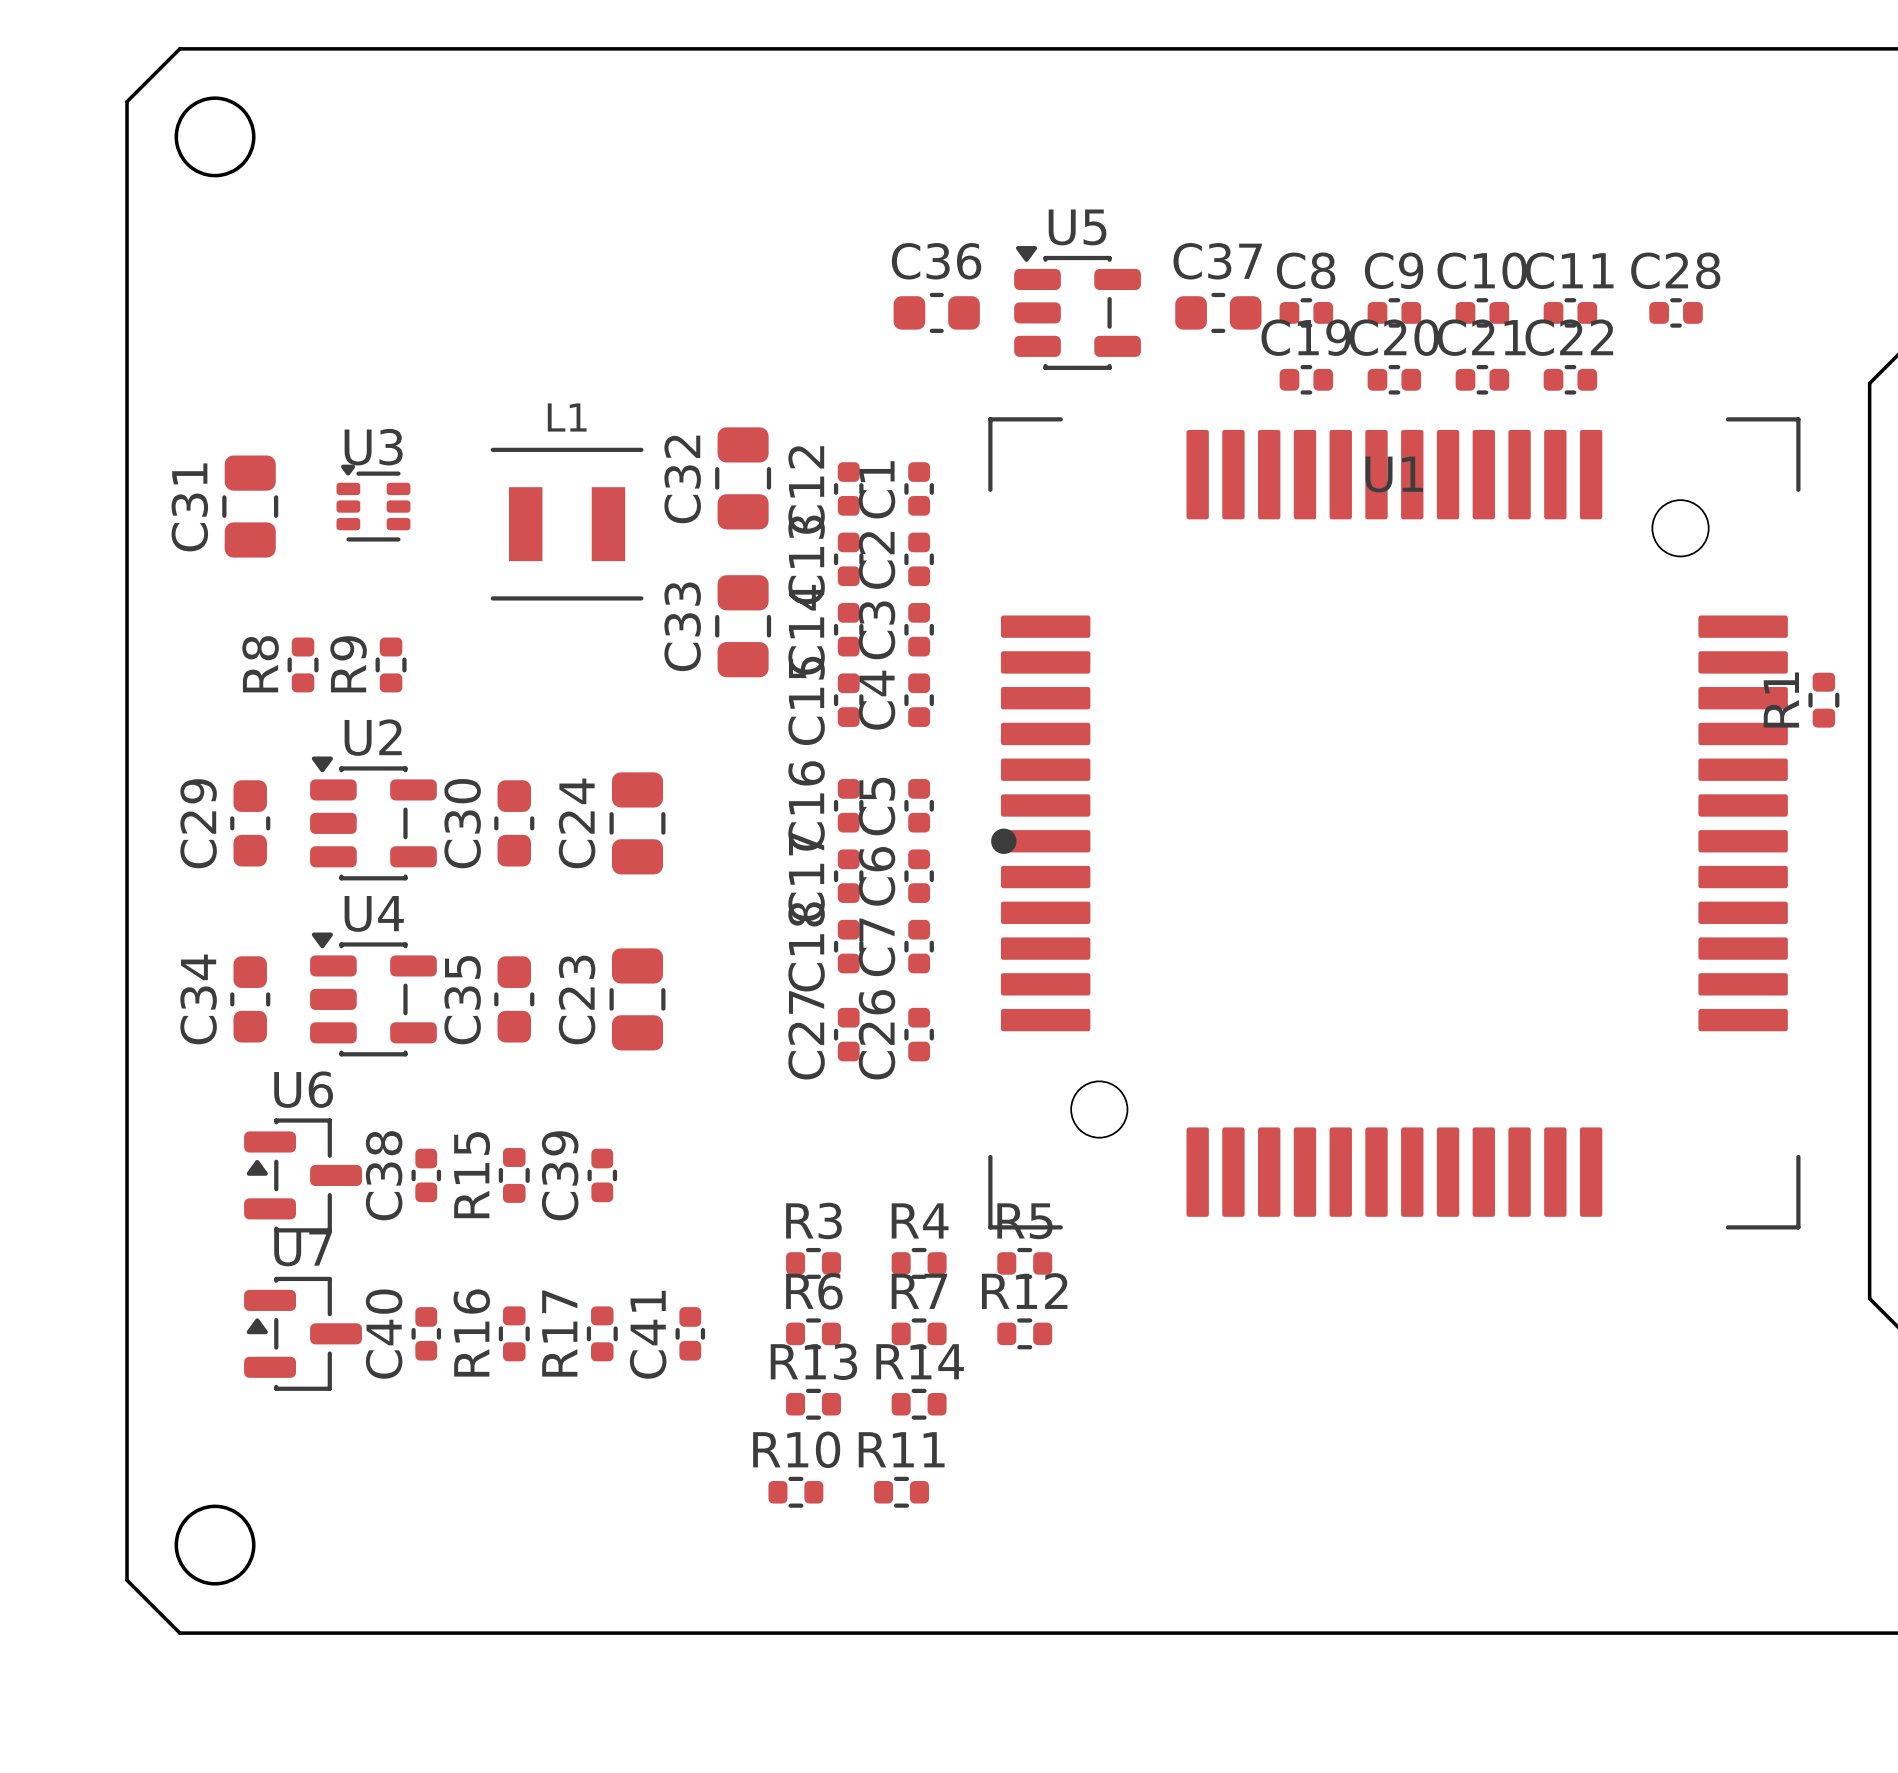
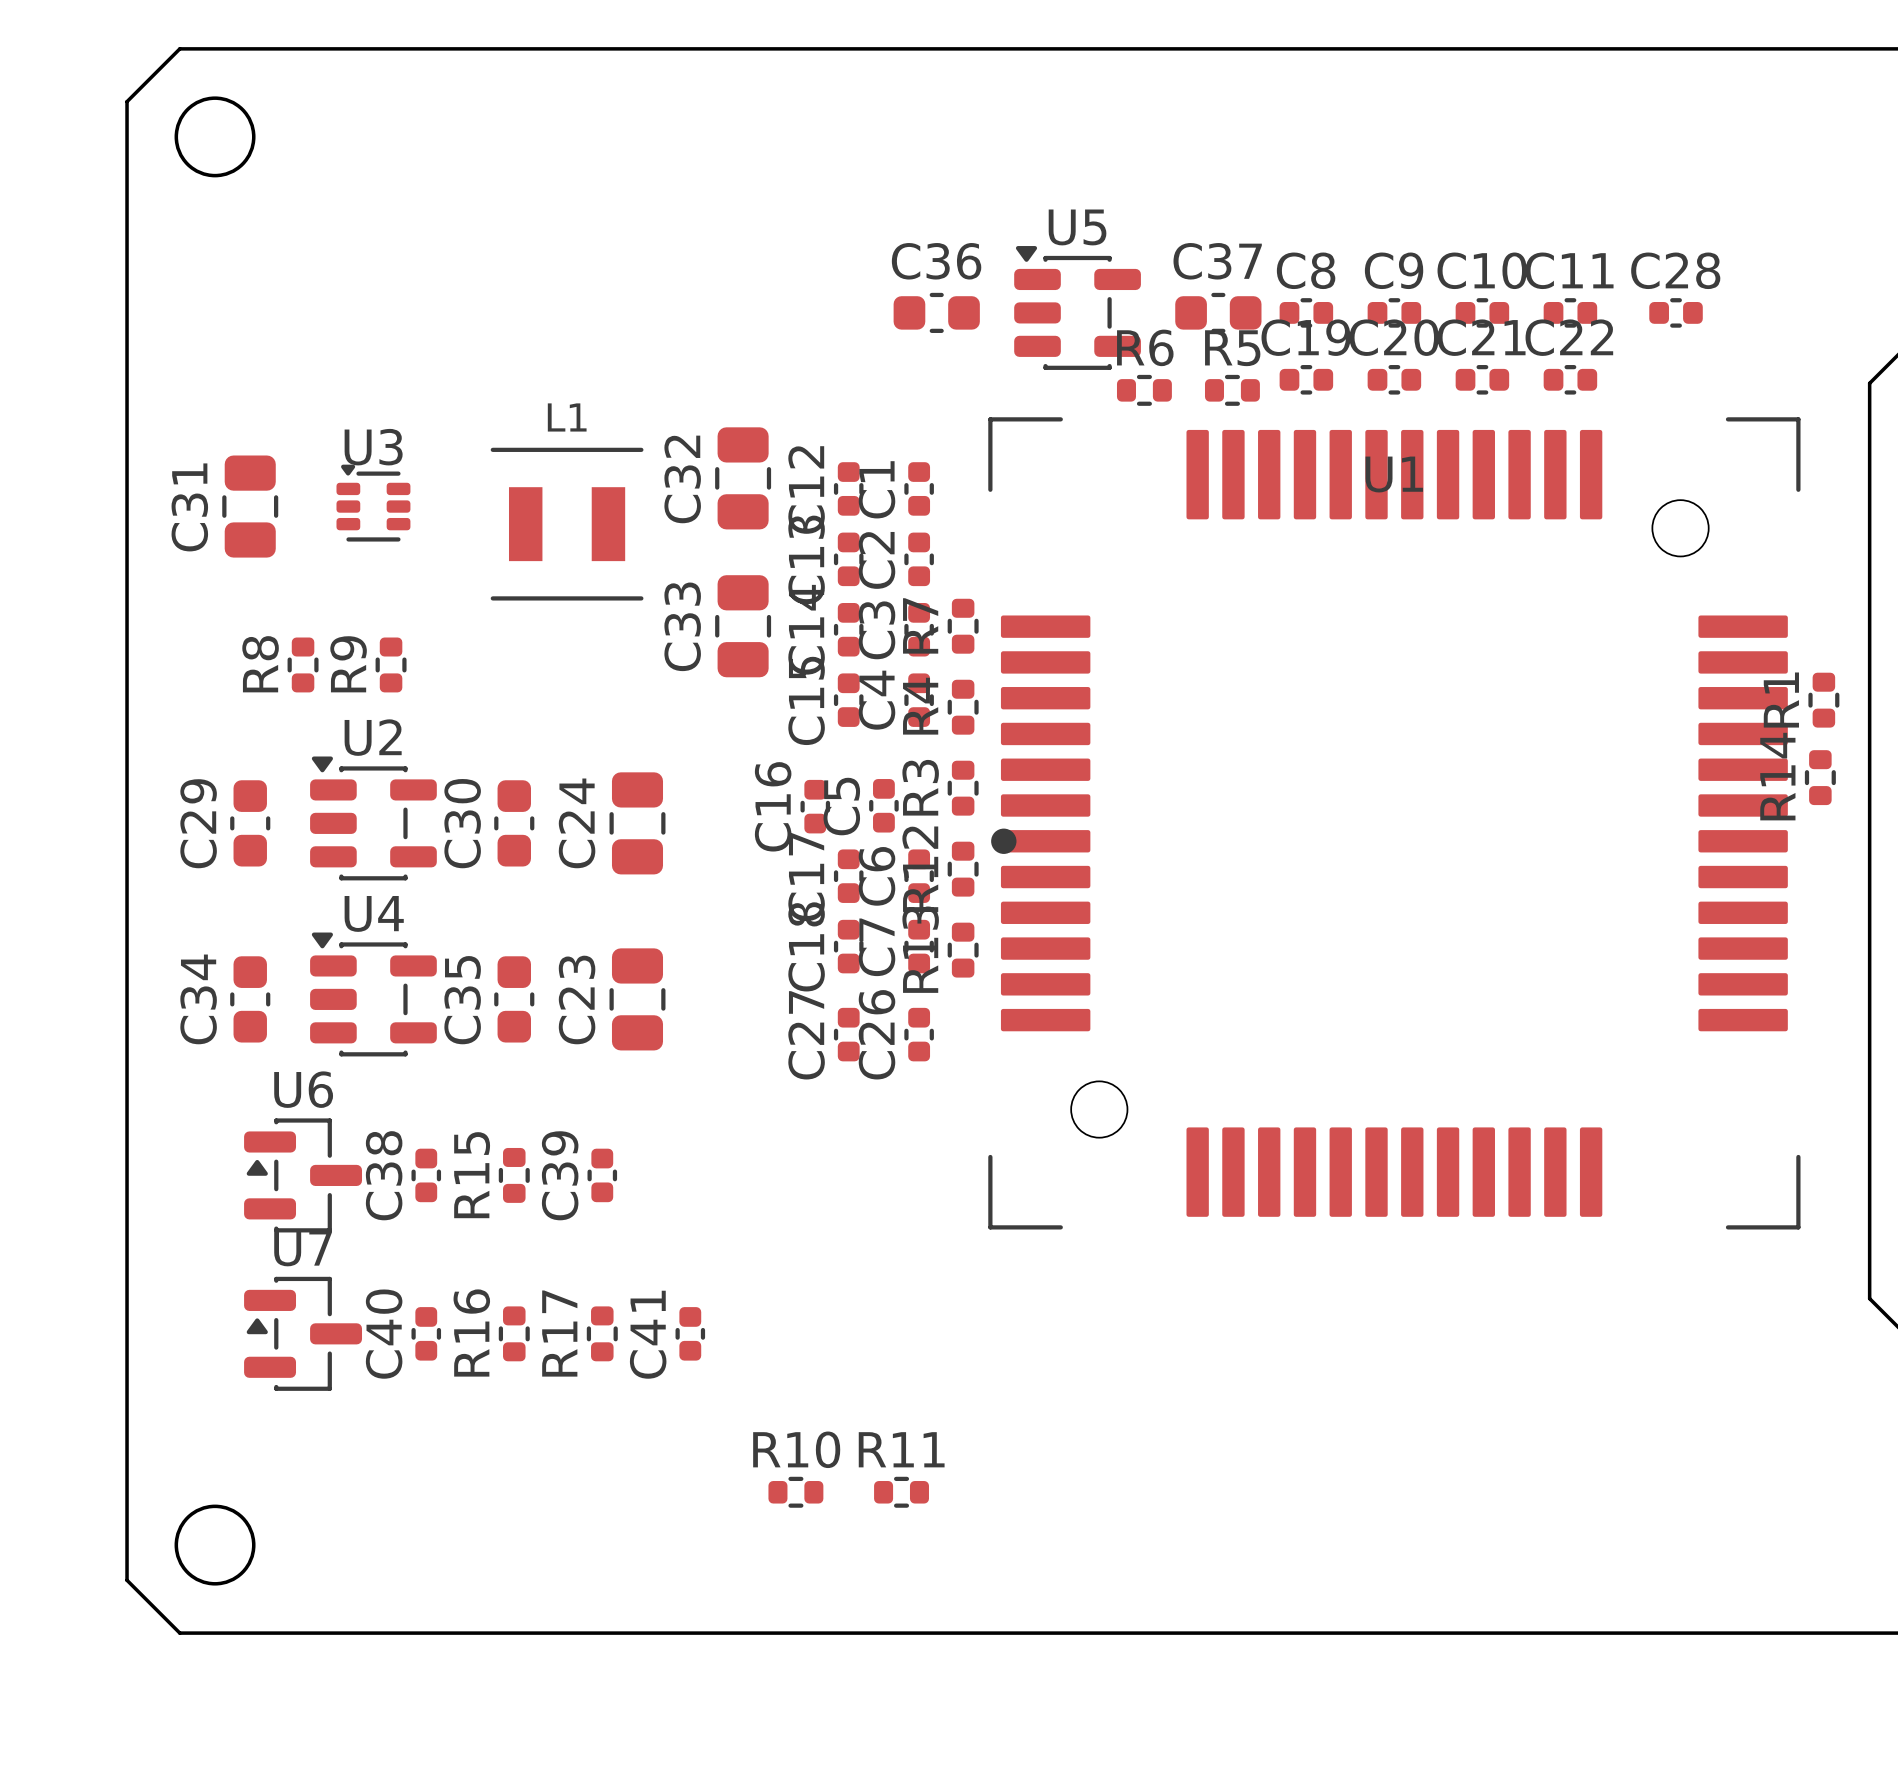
C16 position: (848, 805) -> (815, 806)
C5 position: (919, 805) -> (883, 805)
R3 rotation: 0° (813, 1263) -> 90° clockwise (963, 788)
R3 position: (813, 1263) -> (963, 788)
R4 rotation: 0° (919, 1263) -> 90° clockwise (963, 707)
R4 position: (919, 1263) -> (963, 707)
R5 position: (1024, 1263) -> (1232, 390)
R6 position: (813, 1333) -> (1144, 390)
R7 rotation: 0° (919, 1333) -> 90° clockwise (963, 626)
R7 position: (919, 1333) -> (963, 626)
R12 rotation: 0° (1024, 1333) -> 90° clockwise (963, 869)
R12 position: (1024, 1333) -> (963, 869)
R13 rotation: 0° (813, 1404) -> 90° clockwise (963, 950)
R13 position: (813, 1404) -> (963, 950)
R14 rotation: 0° (919, 1404) -> 90° clockwise (1820, 777)
R14 position: (919, 1404) -> (1820, 777)

